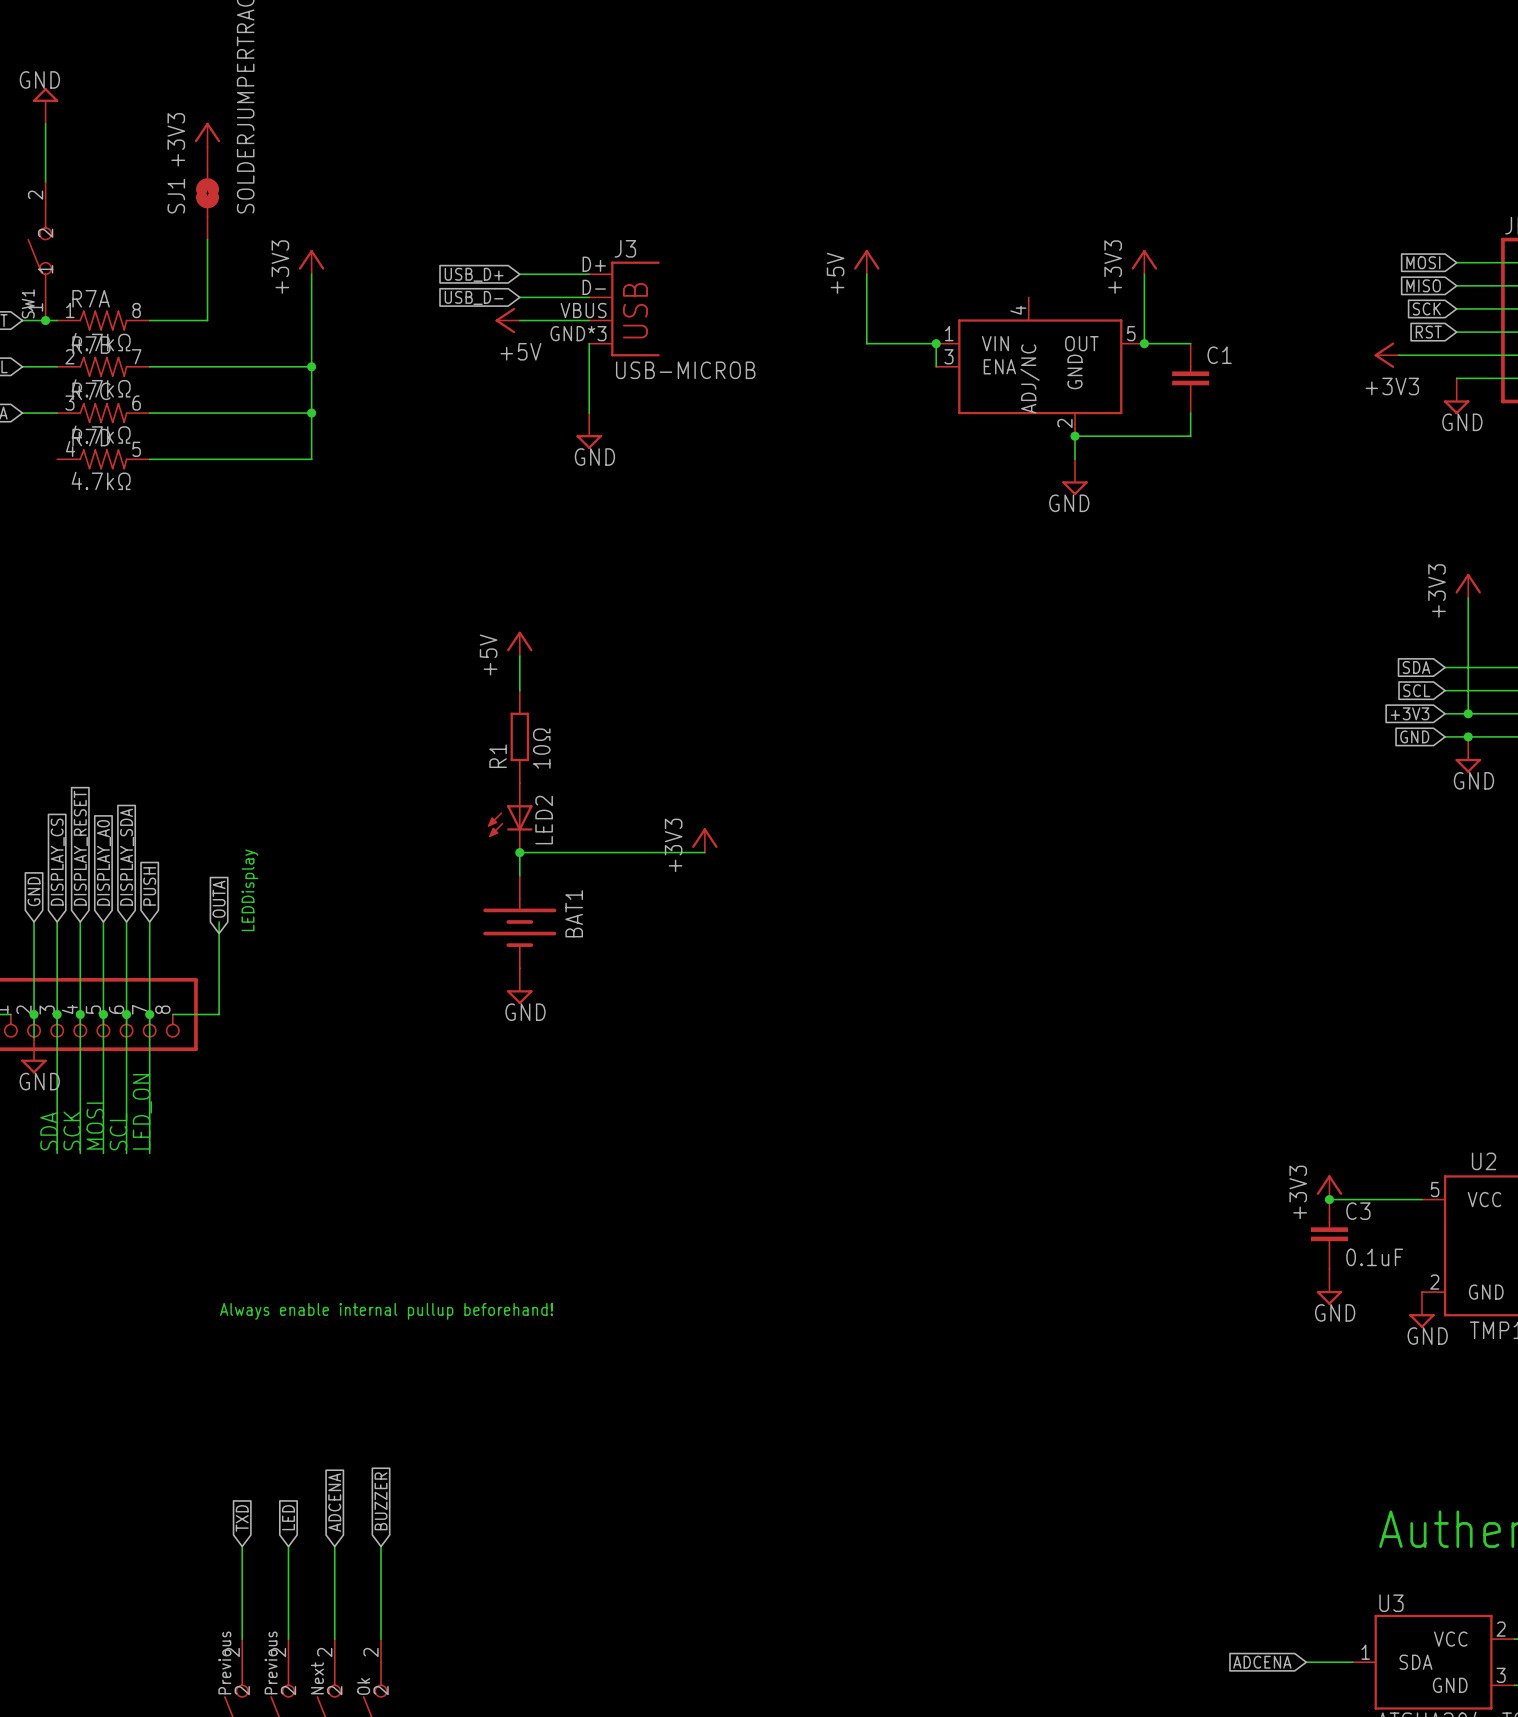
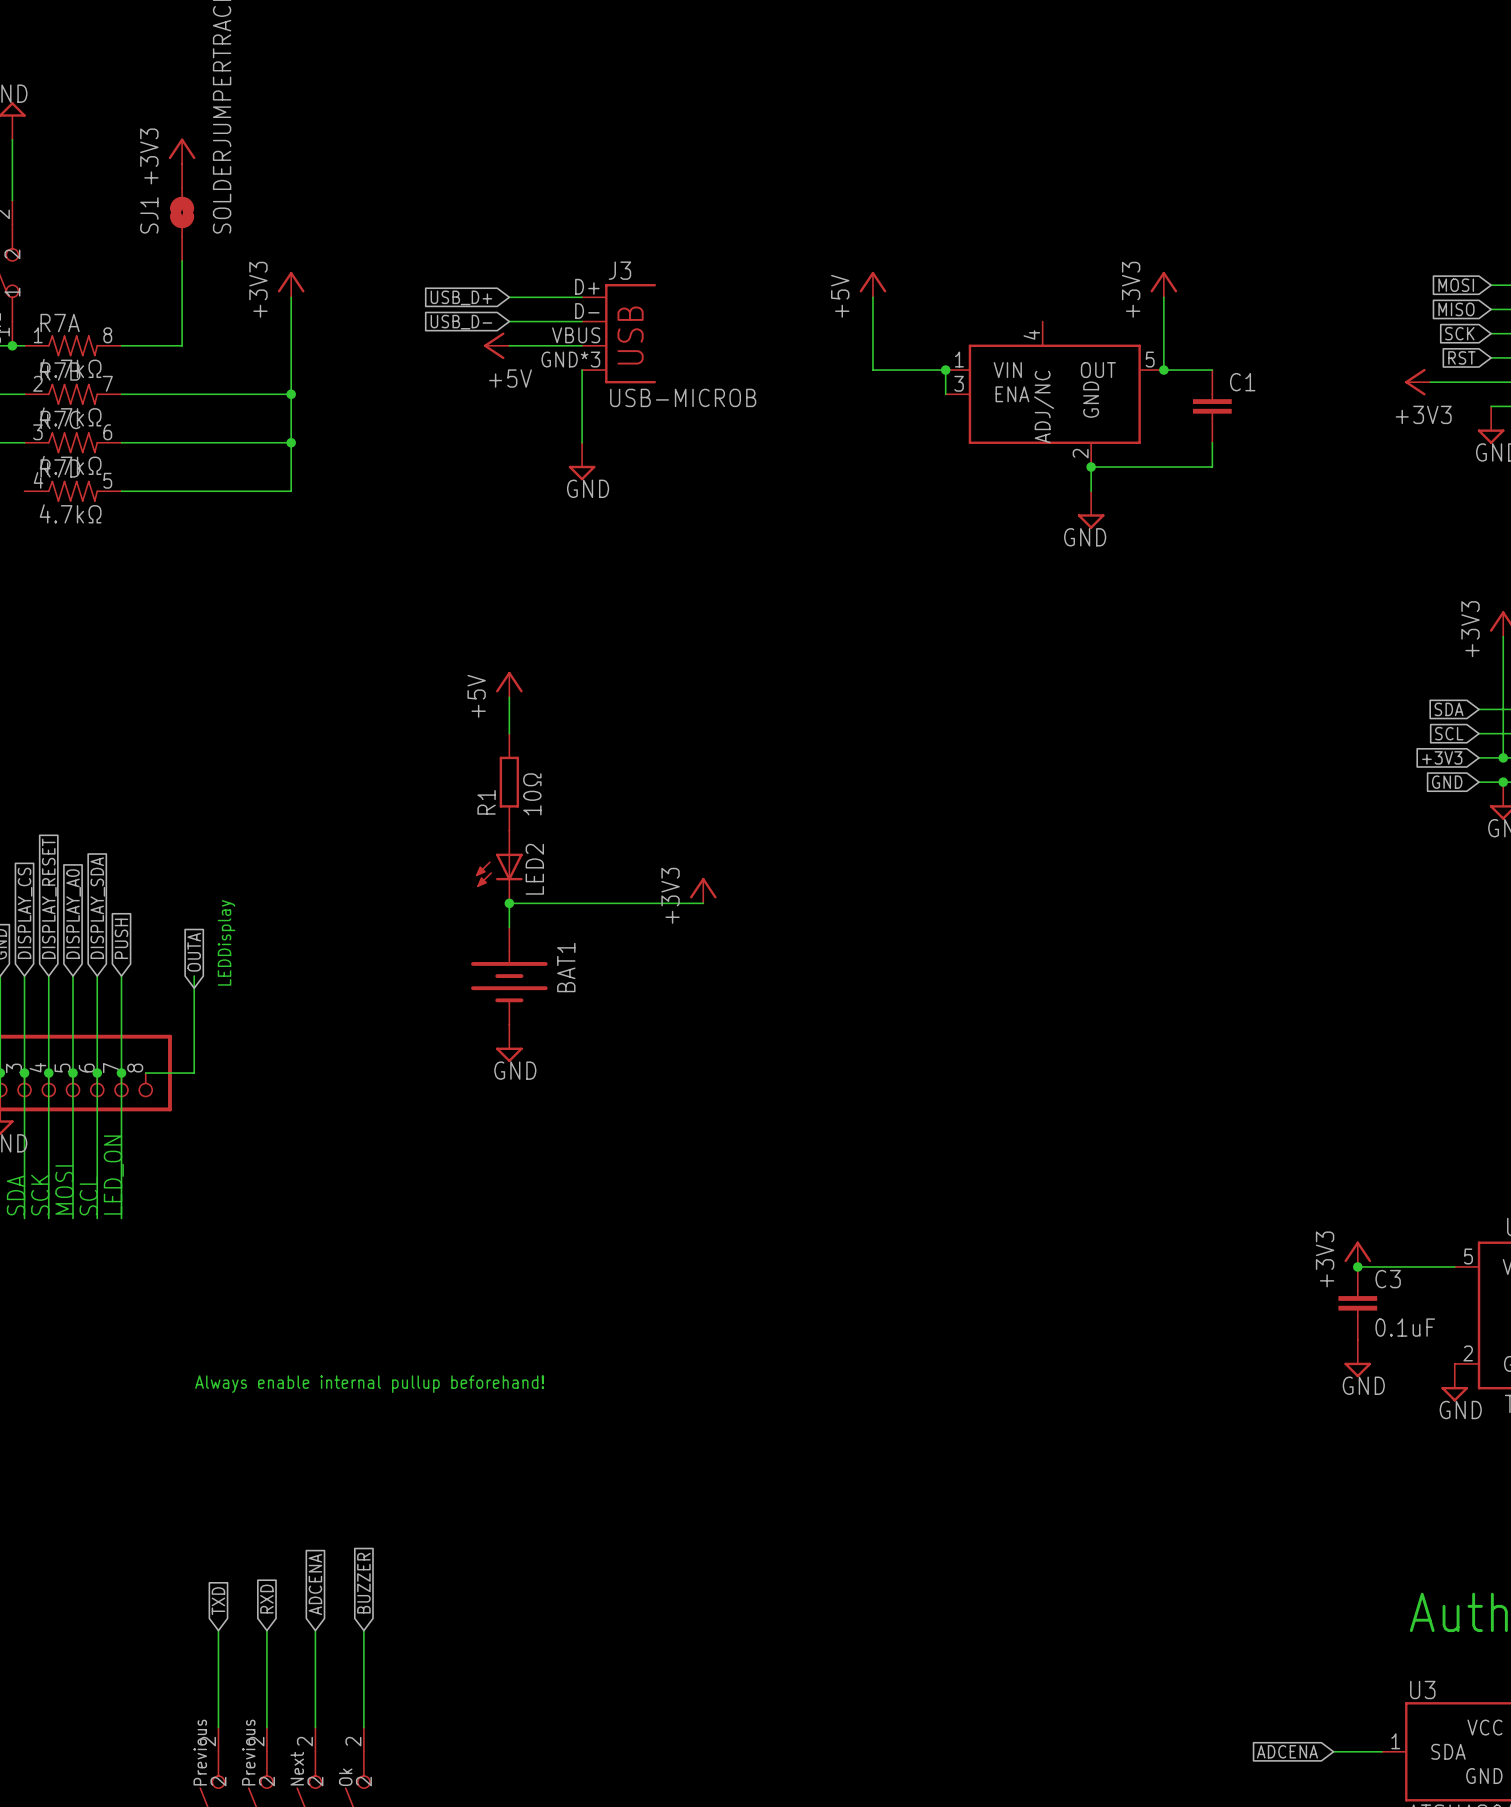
global label: LED (288, 1517) -> RXD (266, 1599)

